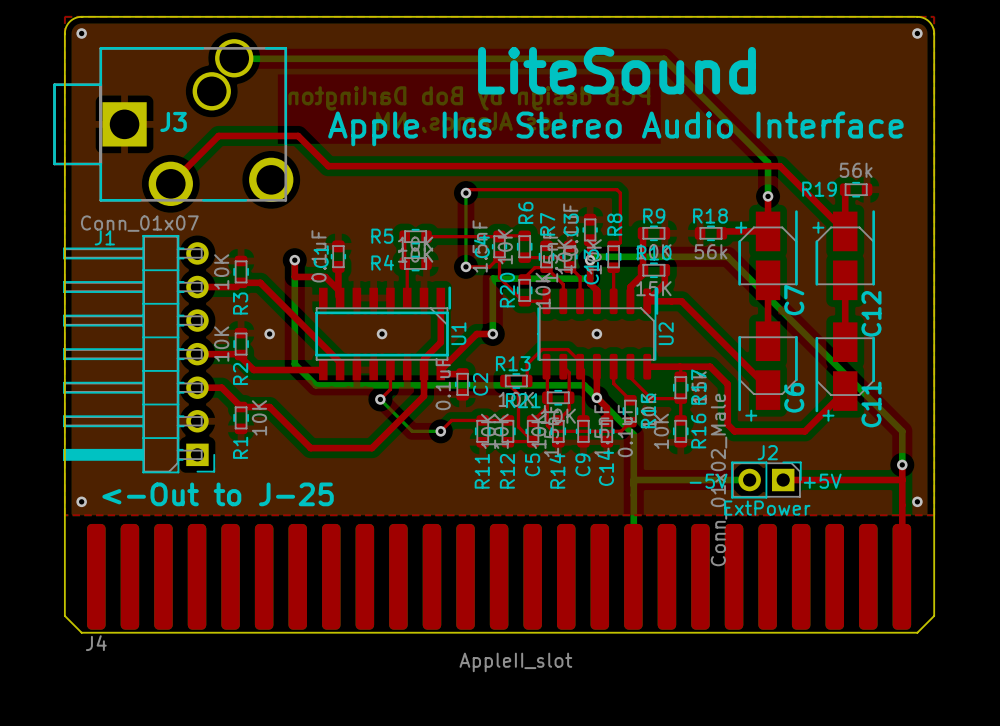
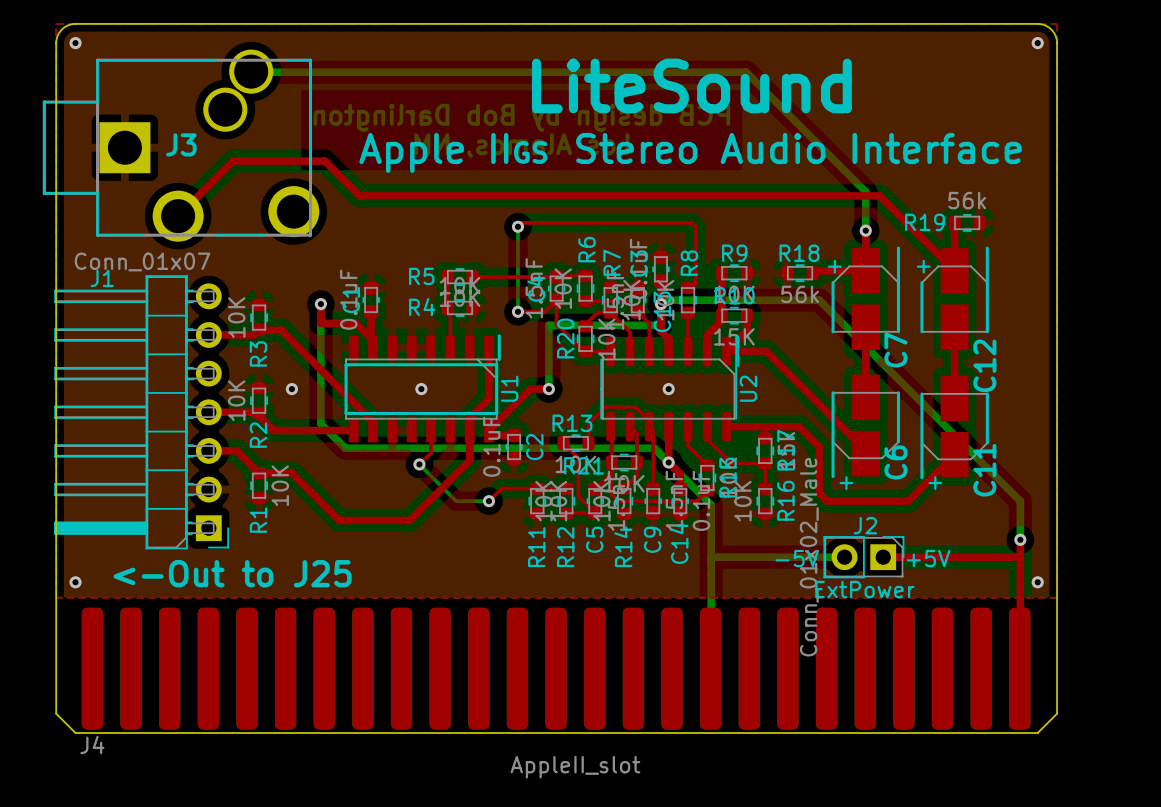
text: <-Out to J-25 (218, 494) -> <-Out to J25 (232, 573)

